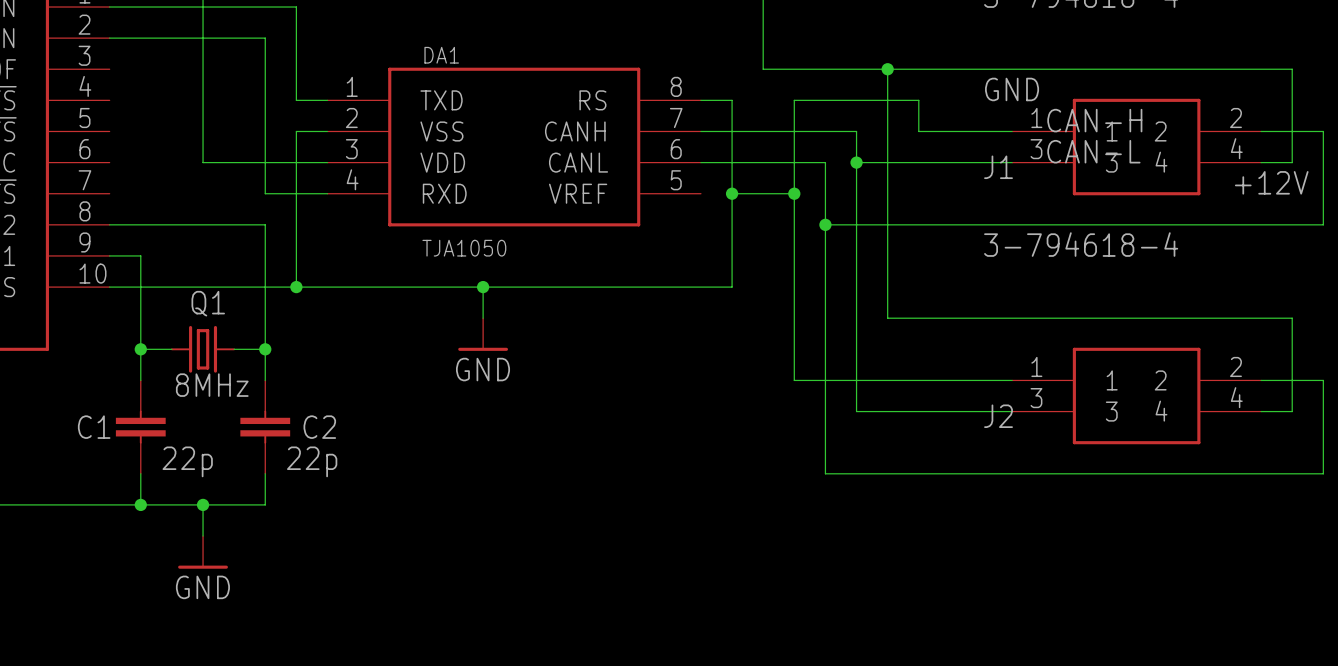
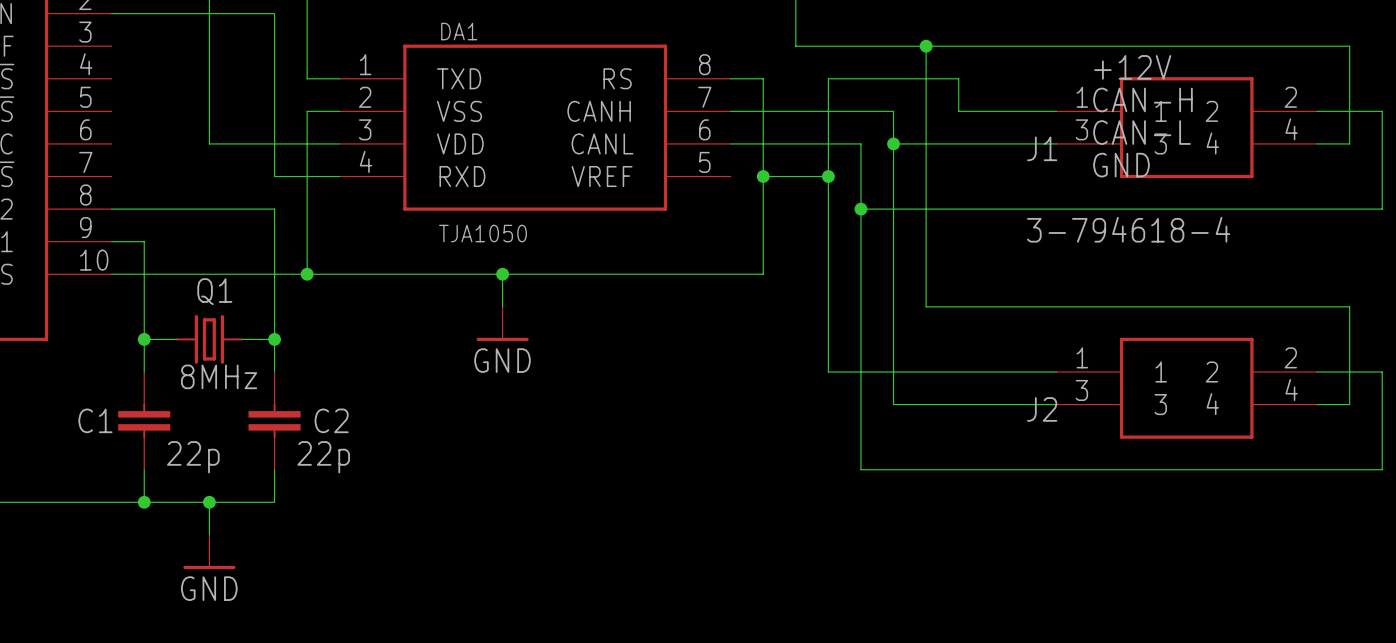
label position: GND (1012, 89) -> GND (1121, 165)
label position: +12V (1271, 182) -> +12V (1132, 67)

